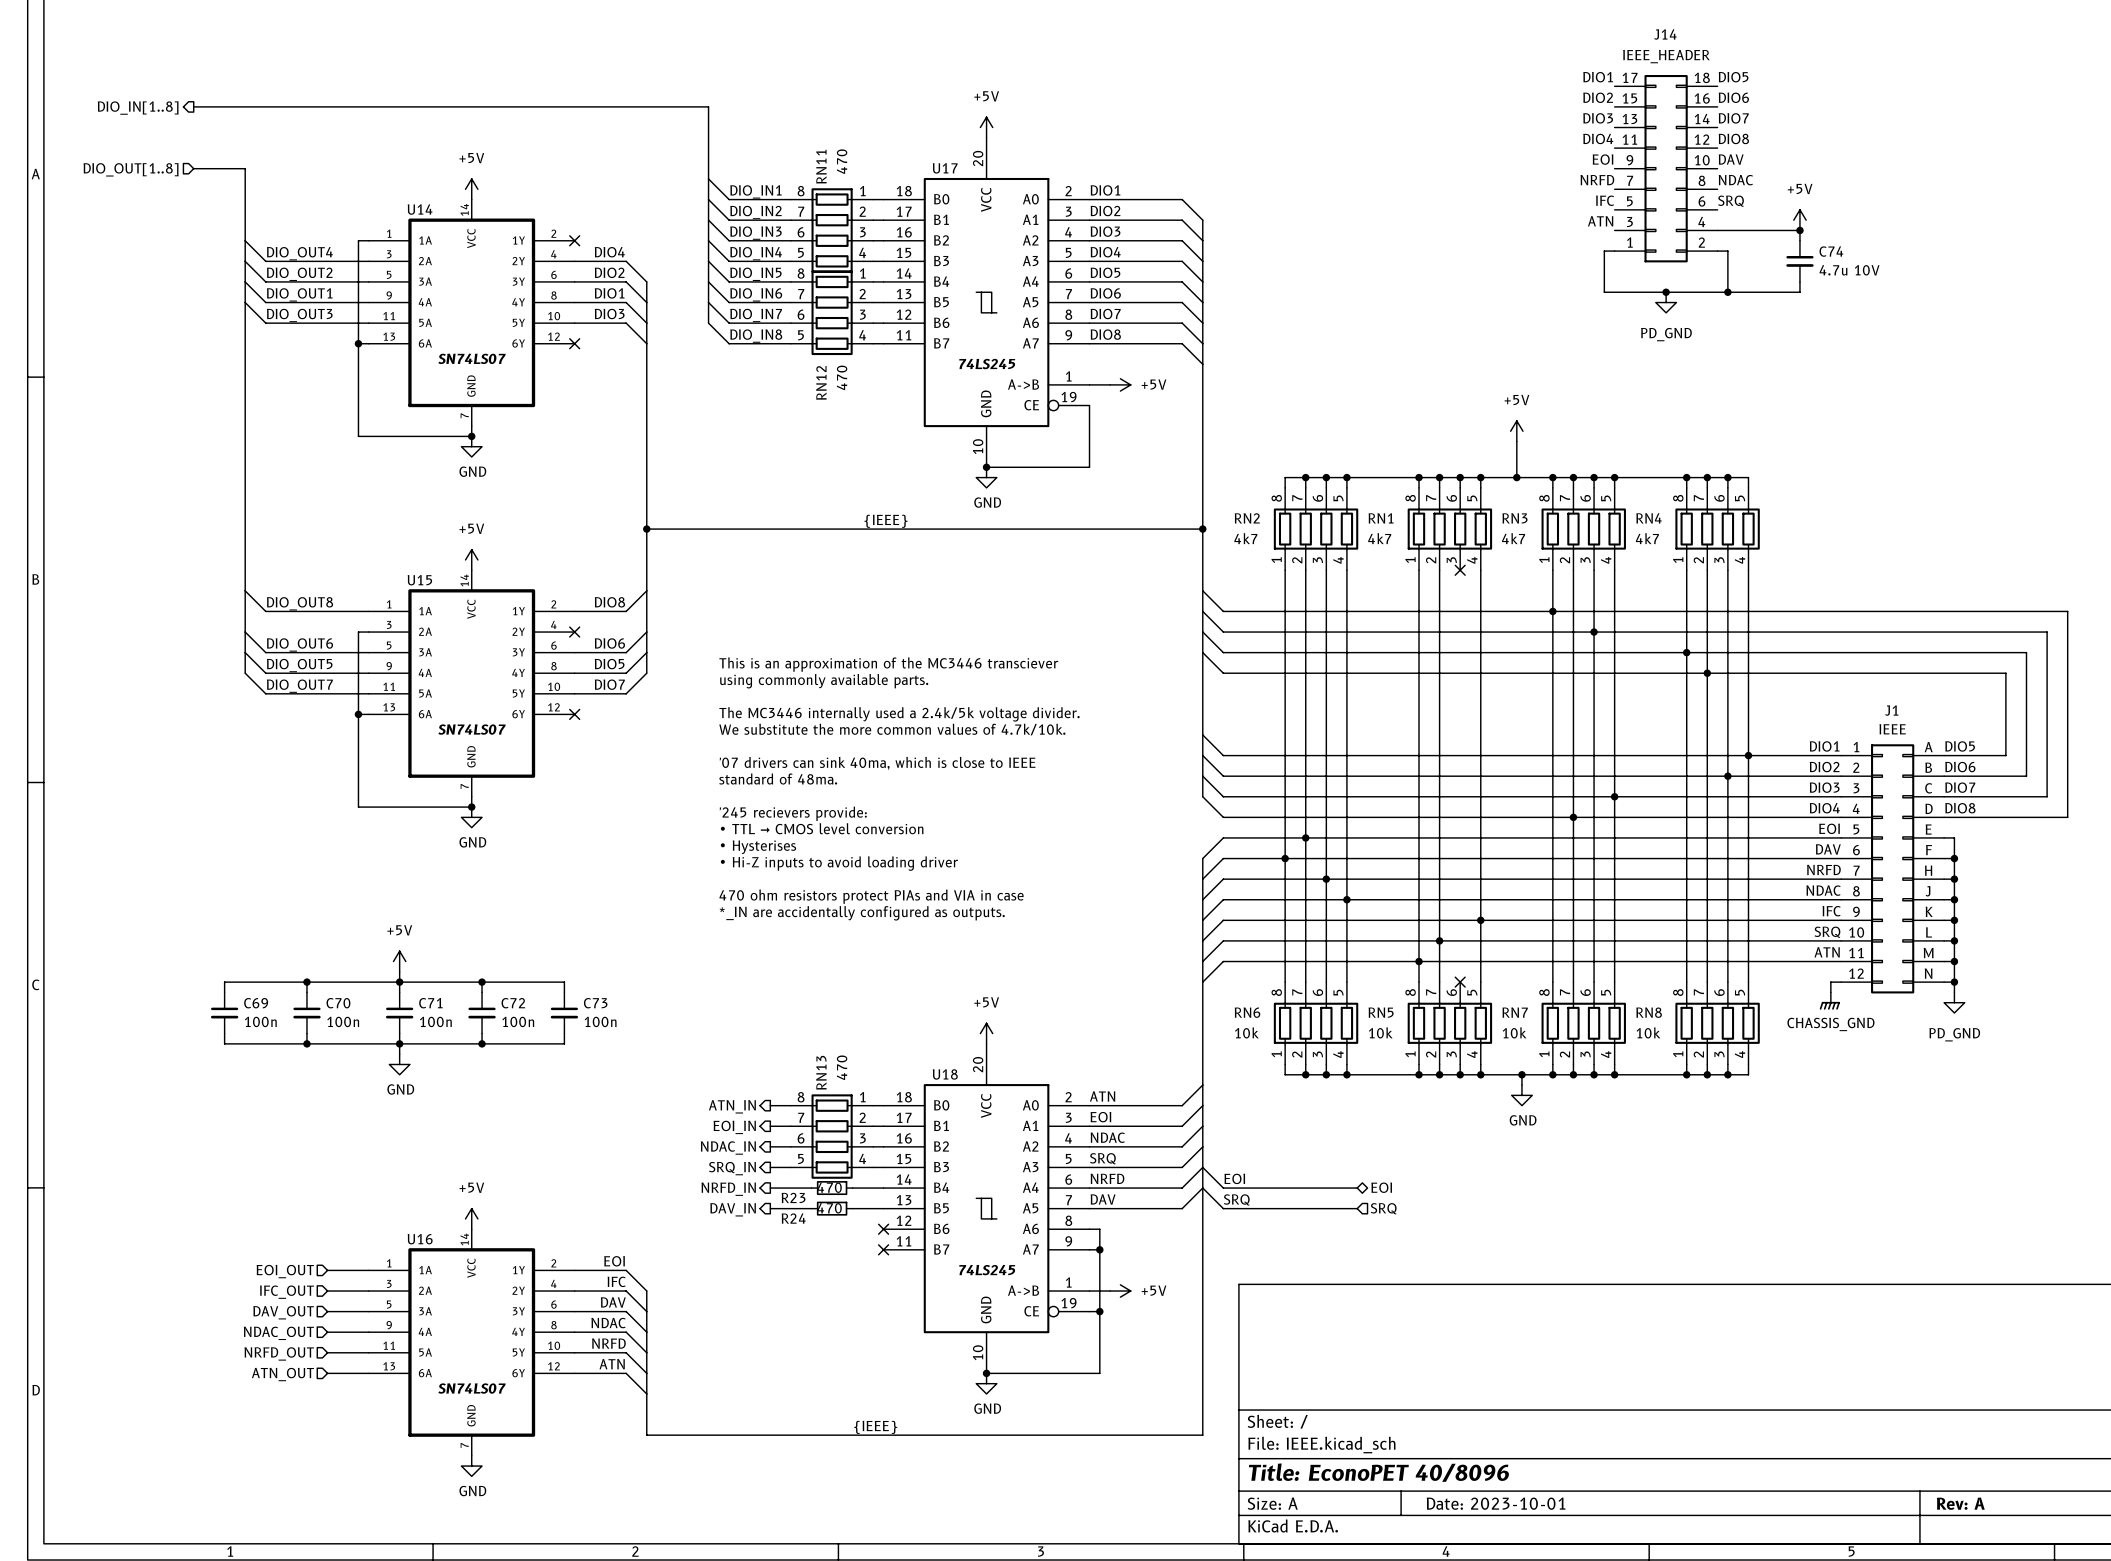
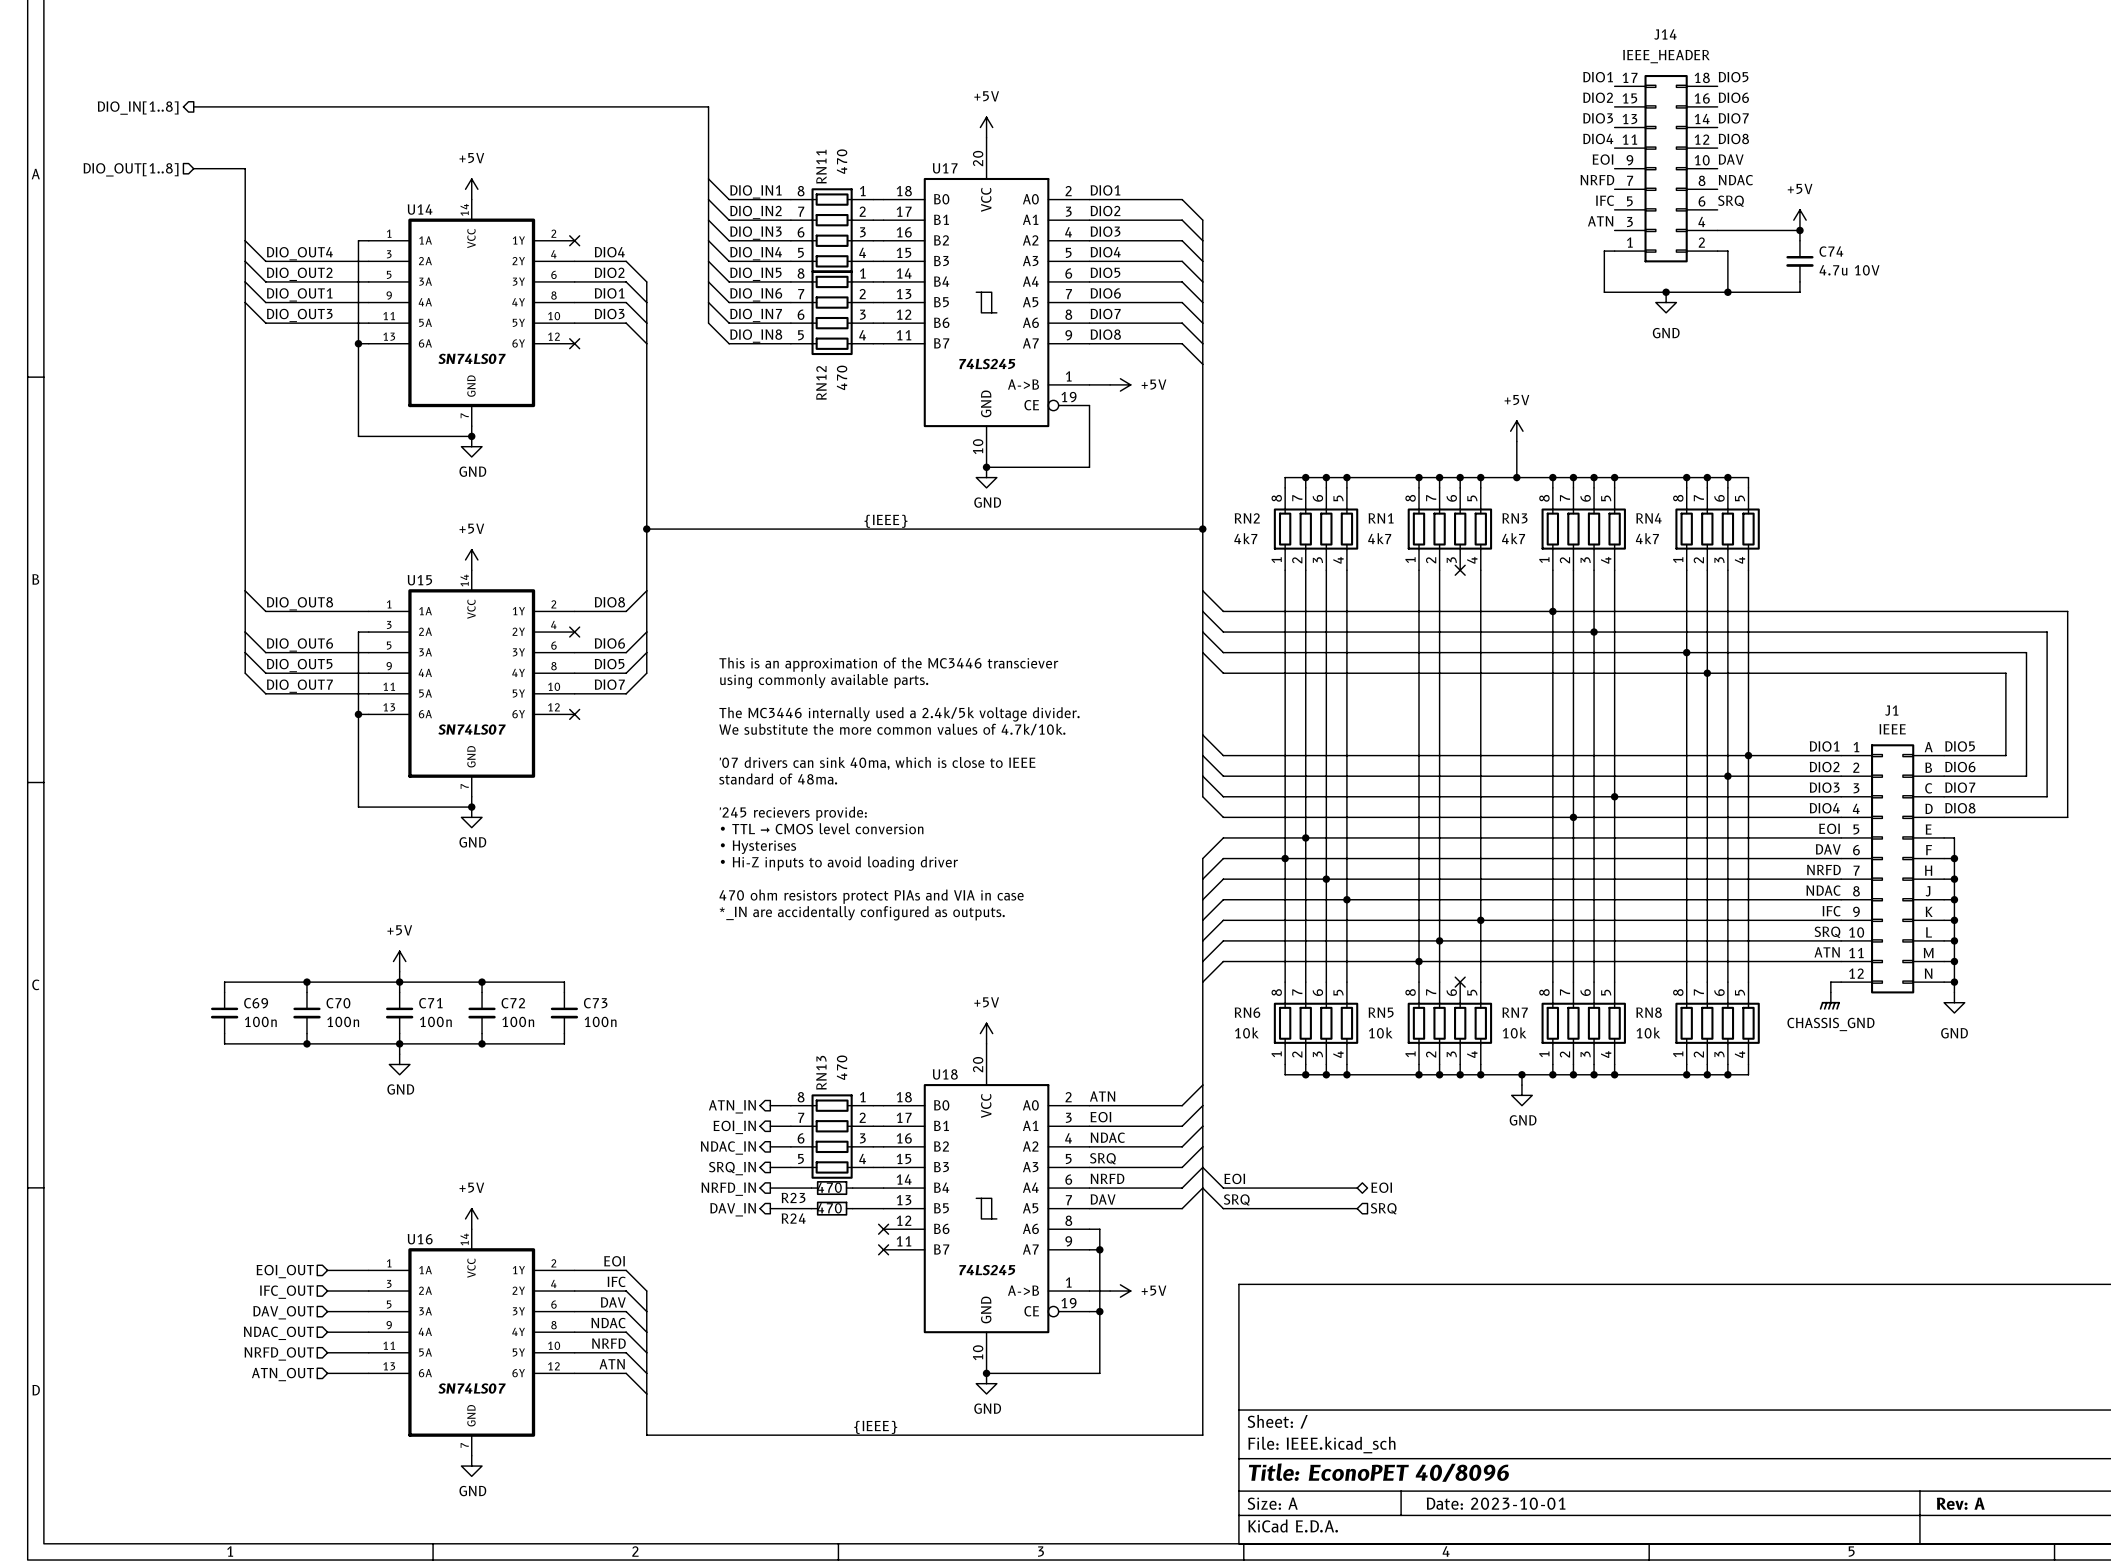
power symbol: PD_GND (1666, 302) -> GND (1666, 302)
power symbol: PD_GND (1954, 1002) -> GND (1954, 1002)

